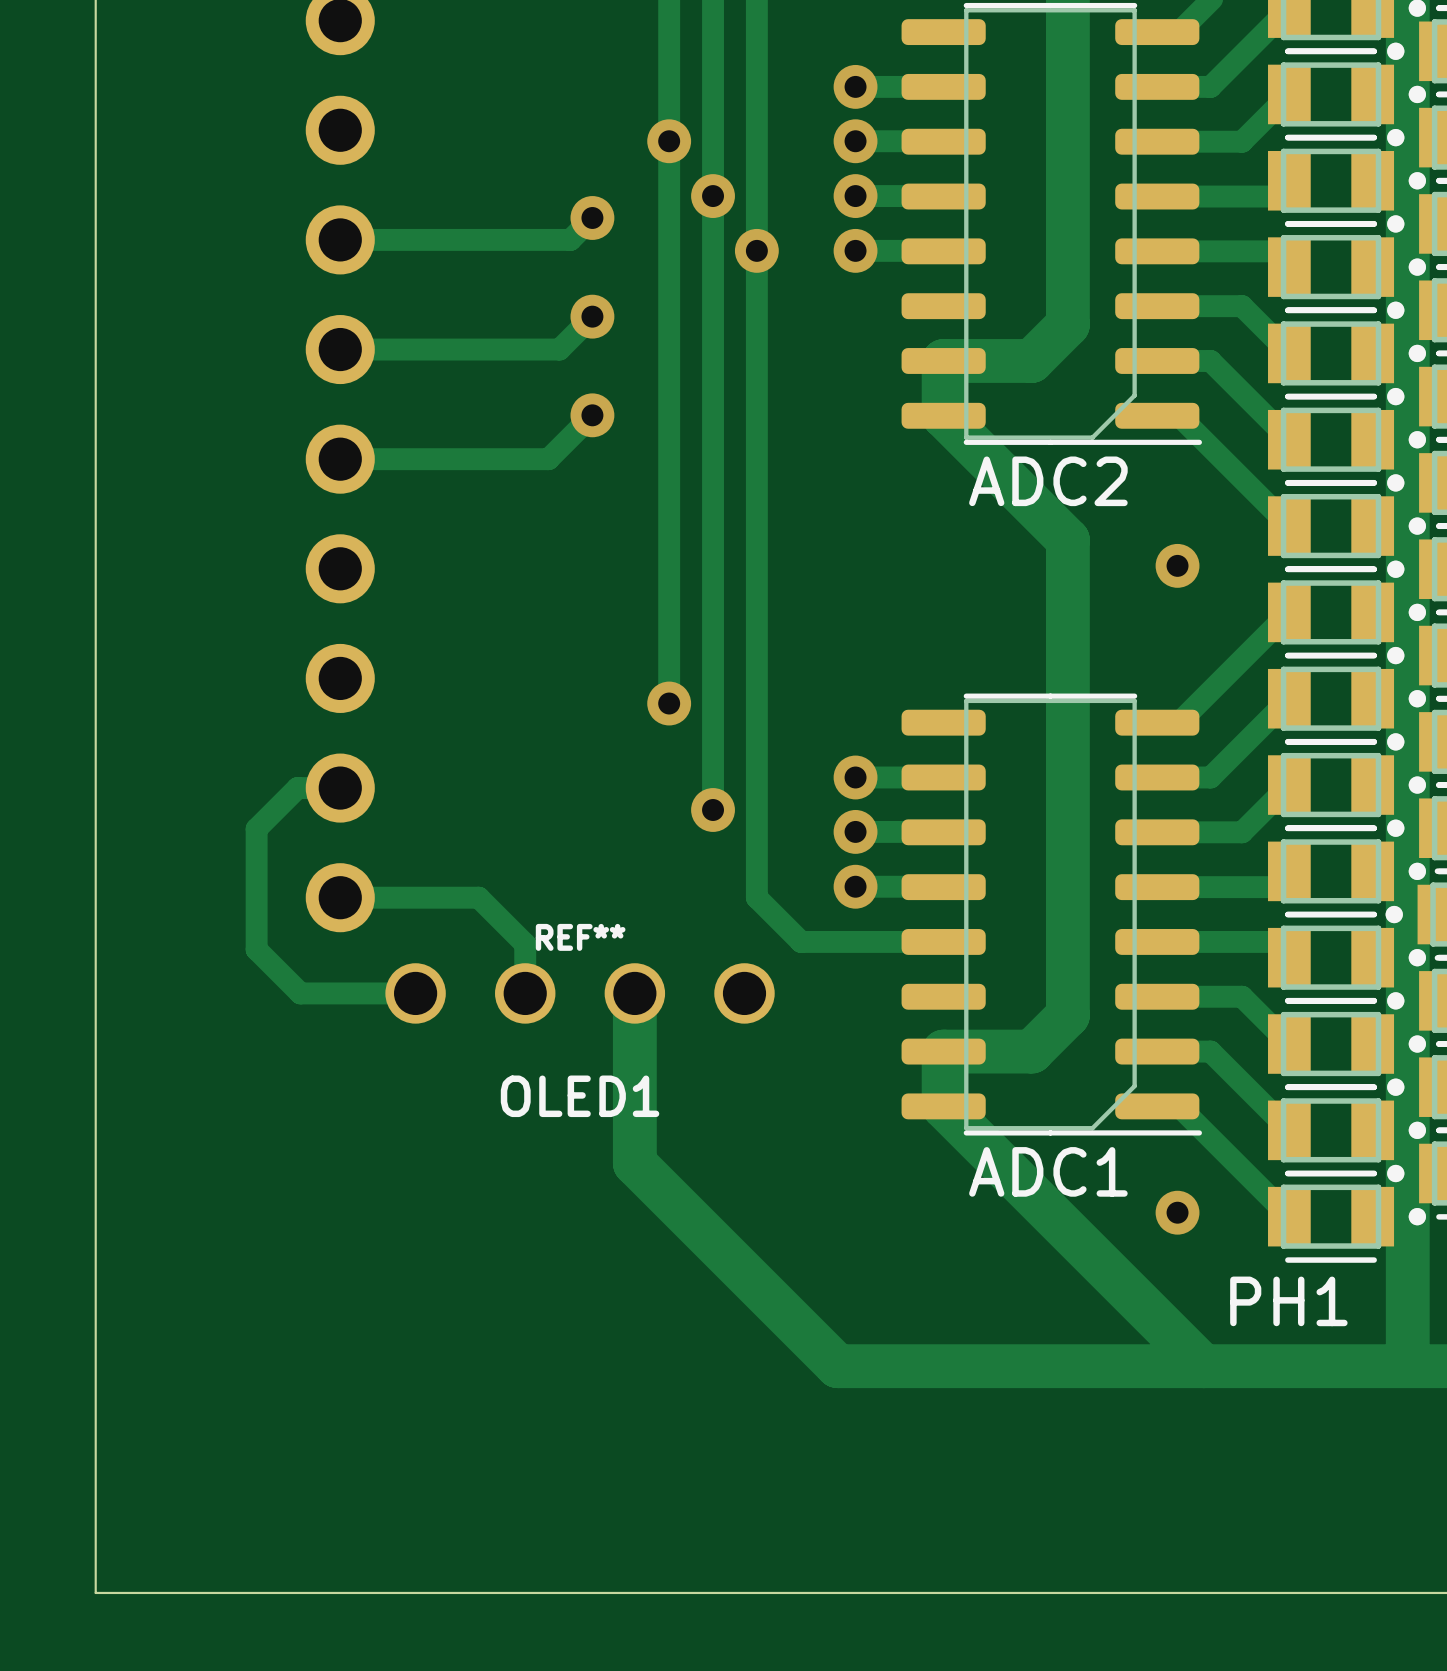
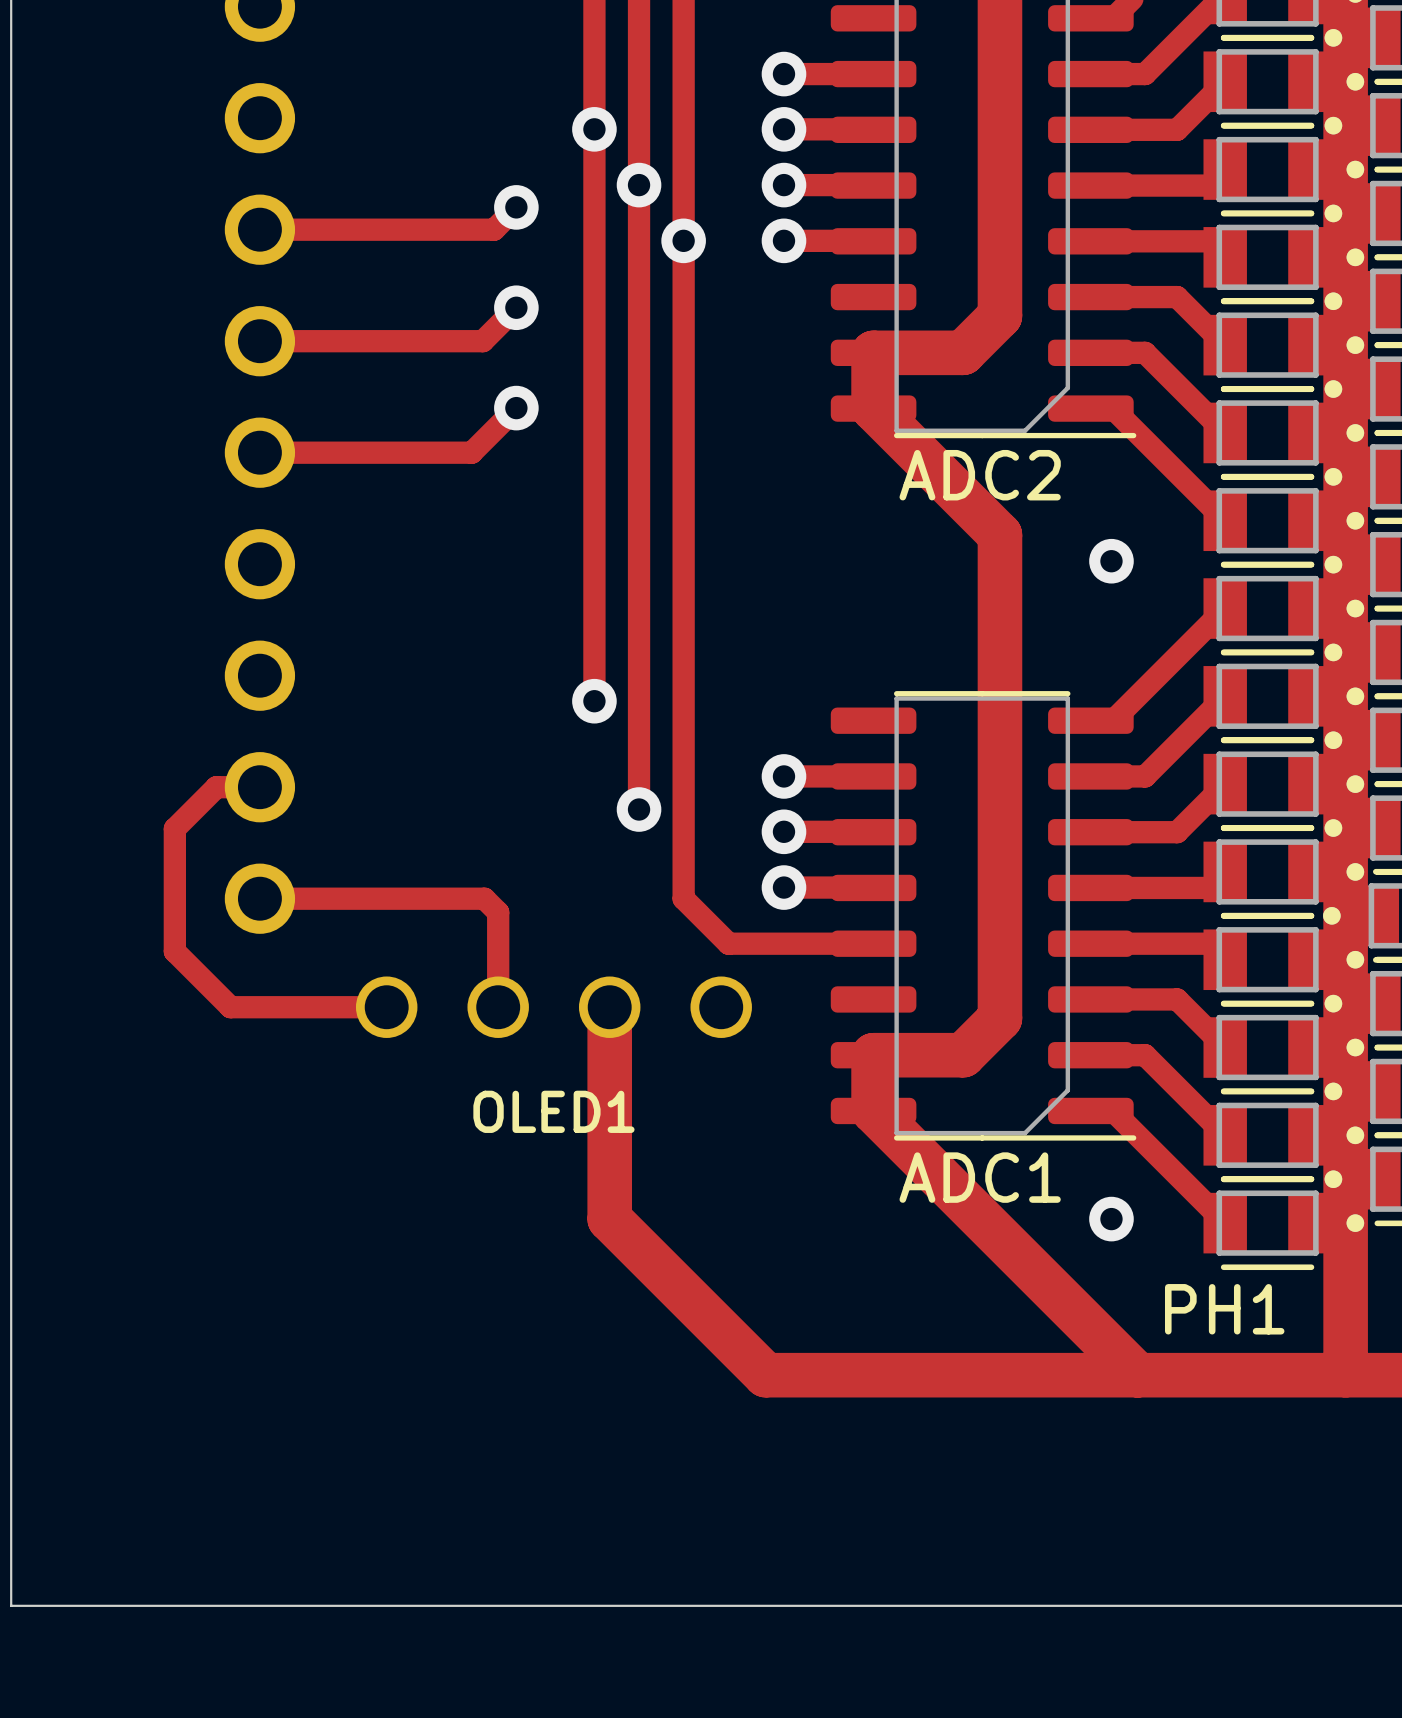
track: (478, 897) (525, 944) (525, 993) -> (400, 898) (484, 898) (498, 912) (498, 1007)
OLED1 text: REF** (580, 937) -> none
track: (300, 993) (415, 993) -> (219, 996) (230, 1007) (386, 1007)
OLED1 position: (580, 993) -> (553, 1007)
track: (634, 993) (634, 1163) (684, 1212) -> (609, 1007) (609, 1219)

